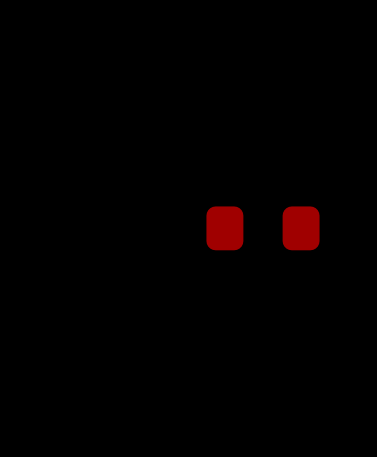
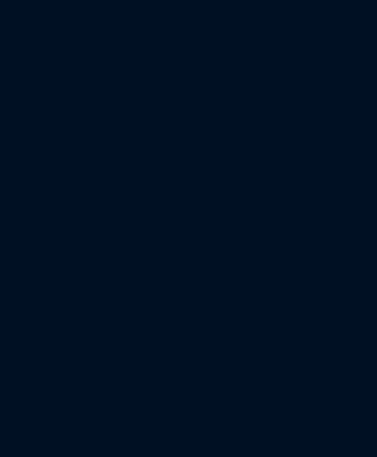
part: (262, 228) -> none

